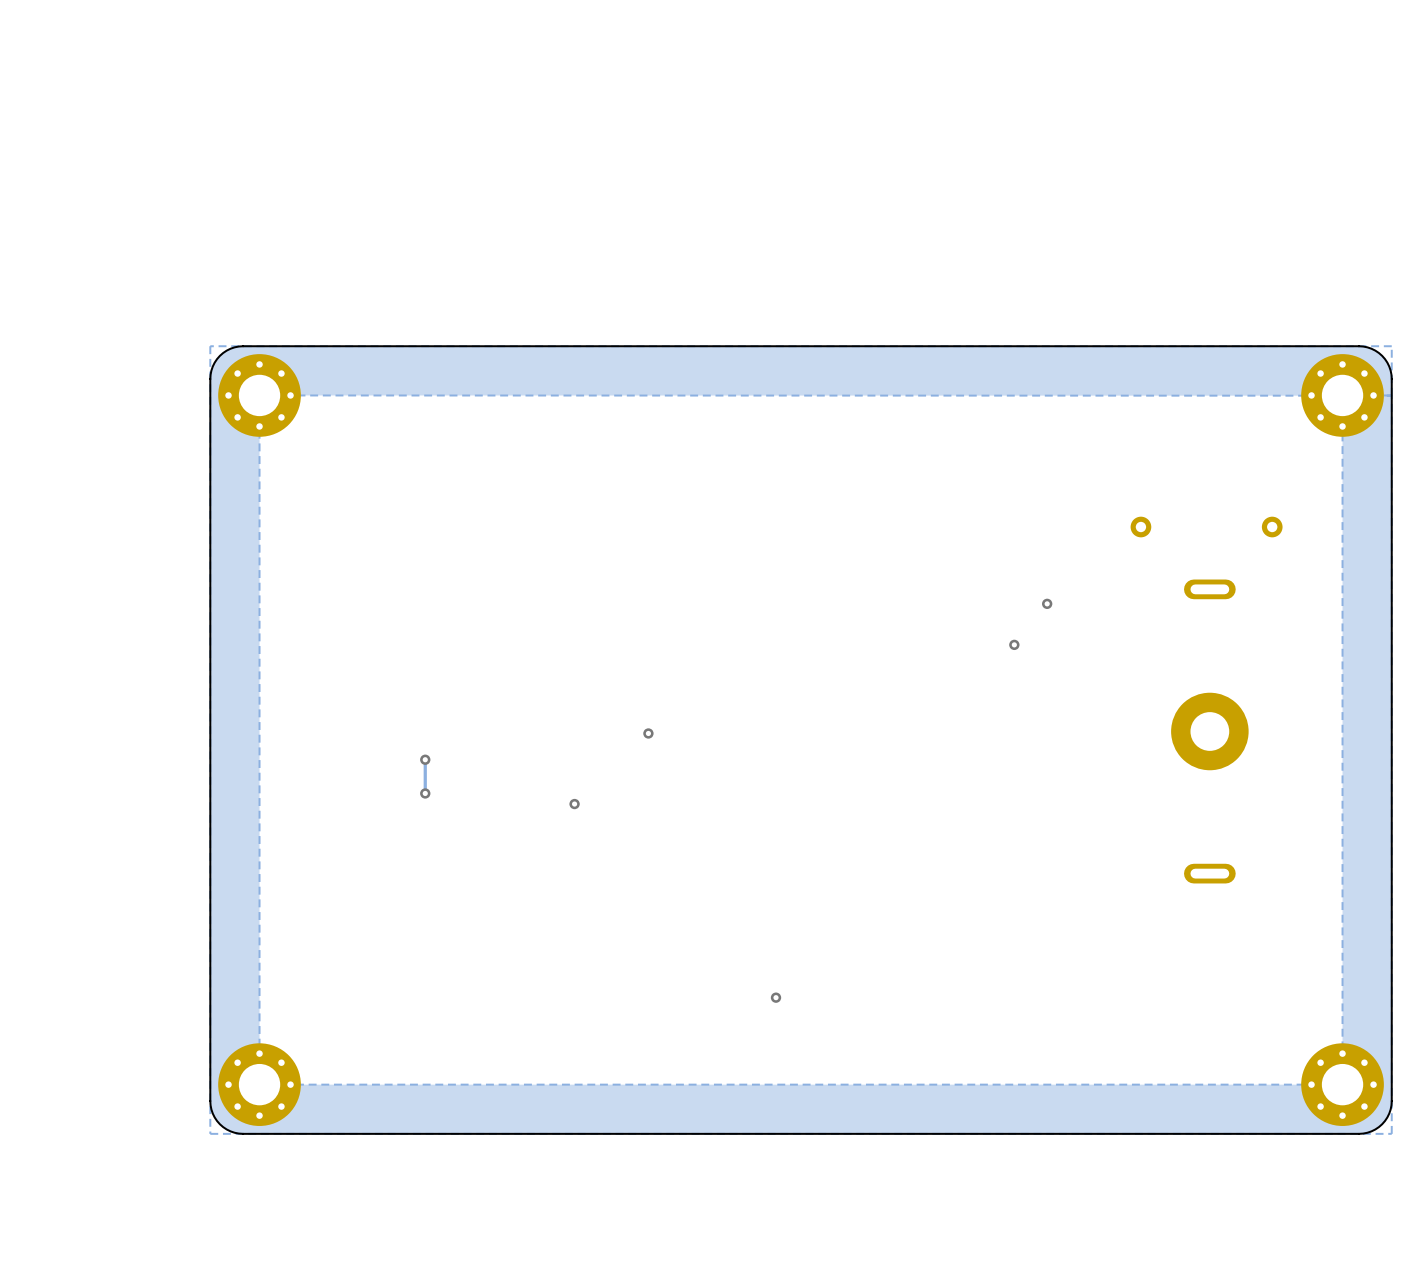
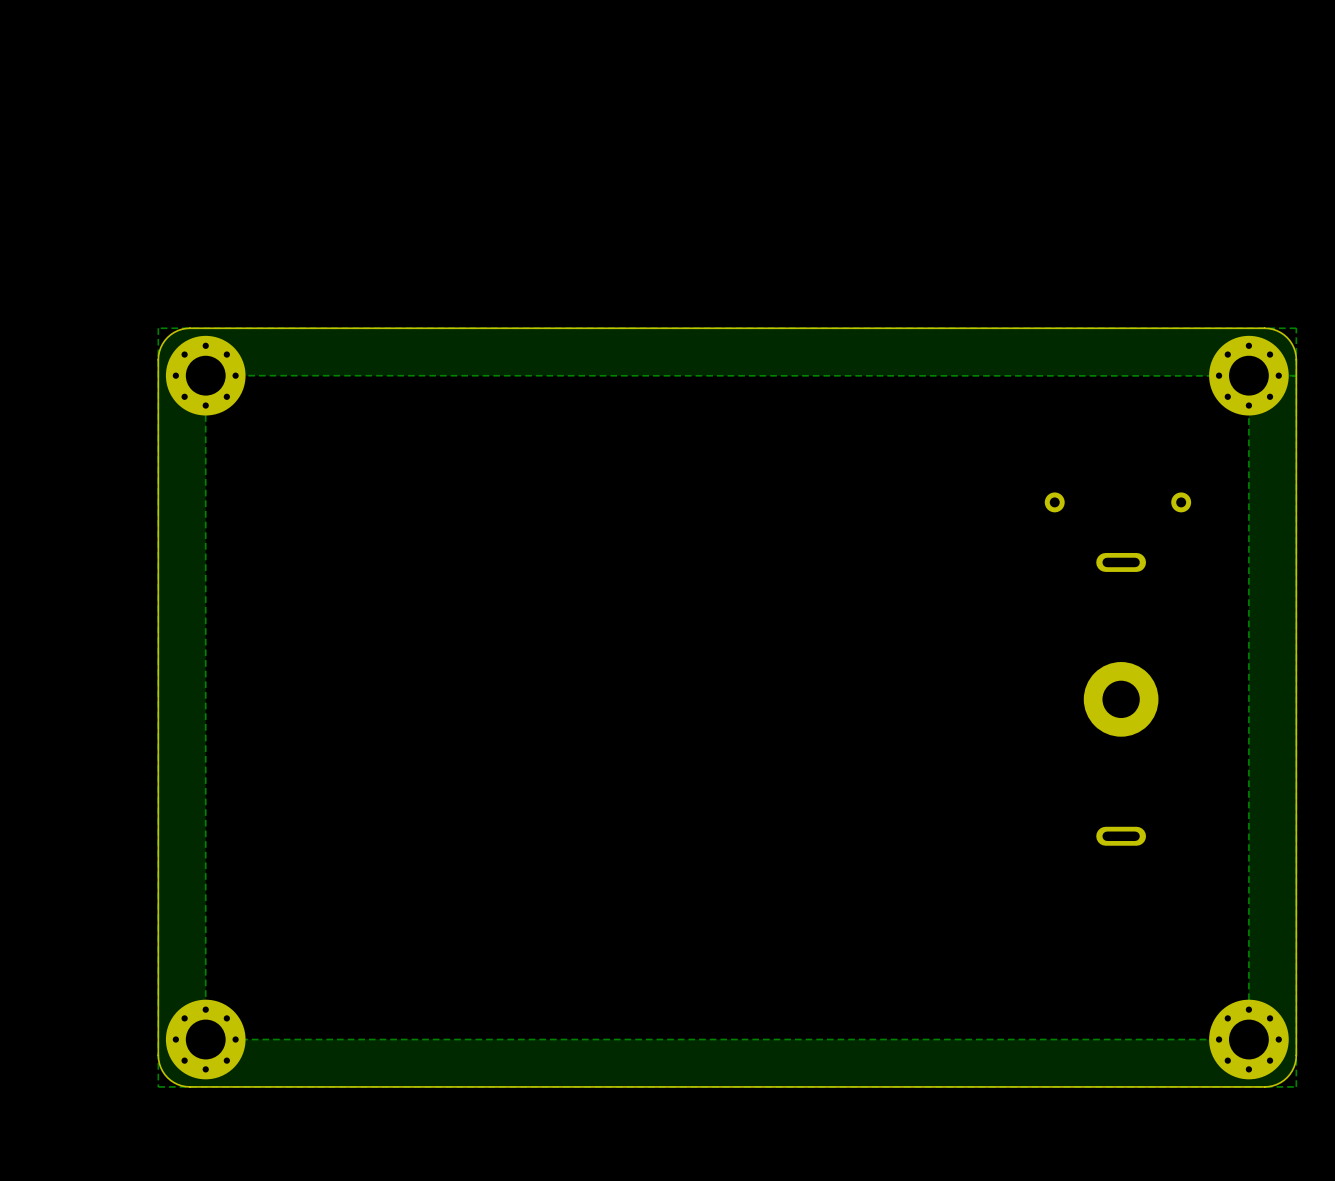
via: (1047, 603) -> none
via: (1014, 644) -> none
via: (648, 733) -> none
track: (425, 759) (425, 793) -> none
via: (425, 759) -> none
via: (425, 793) -> none
via: (574, 804) -> none
via: (776, 997) -> none

